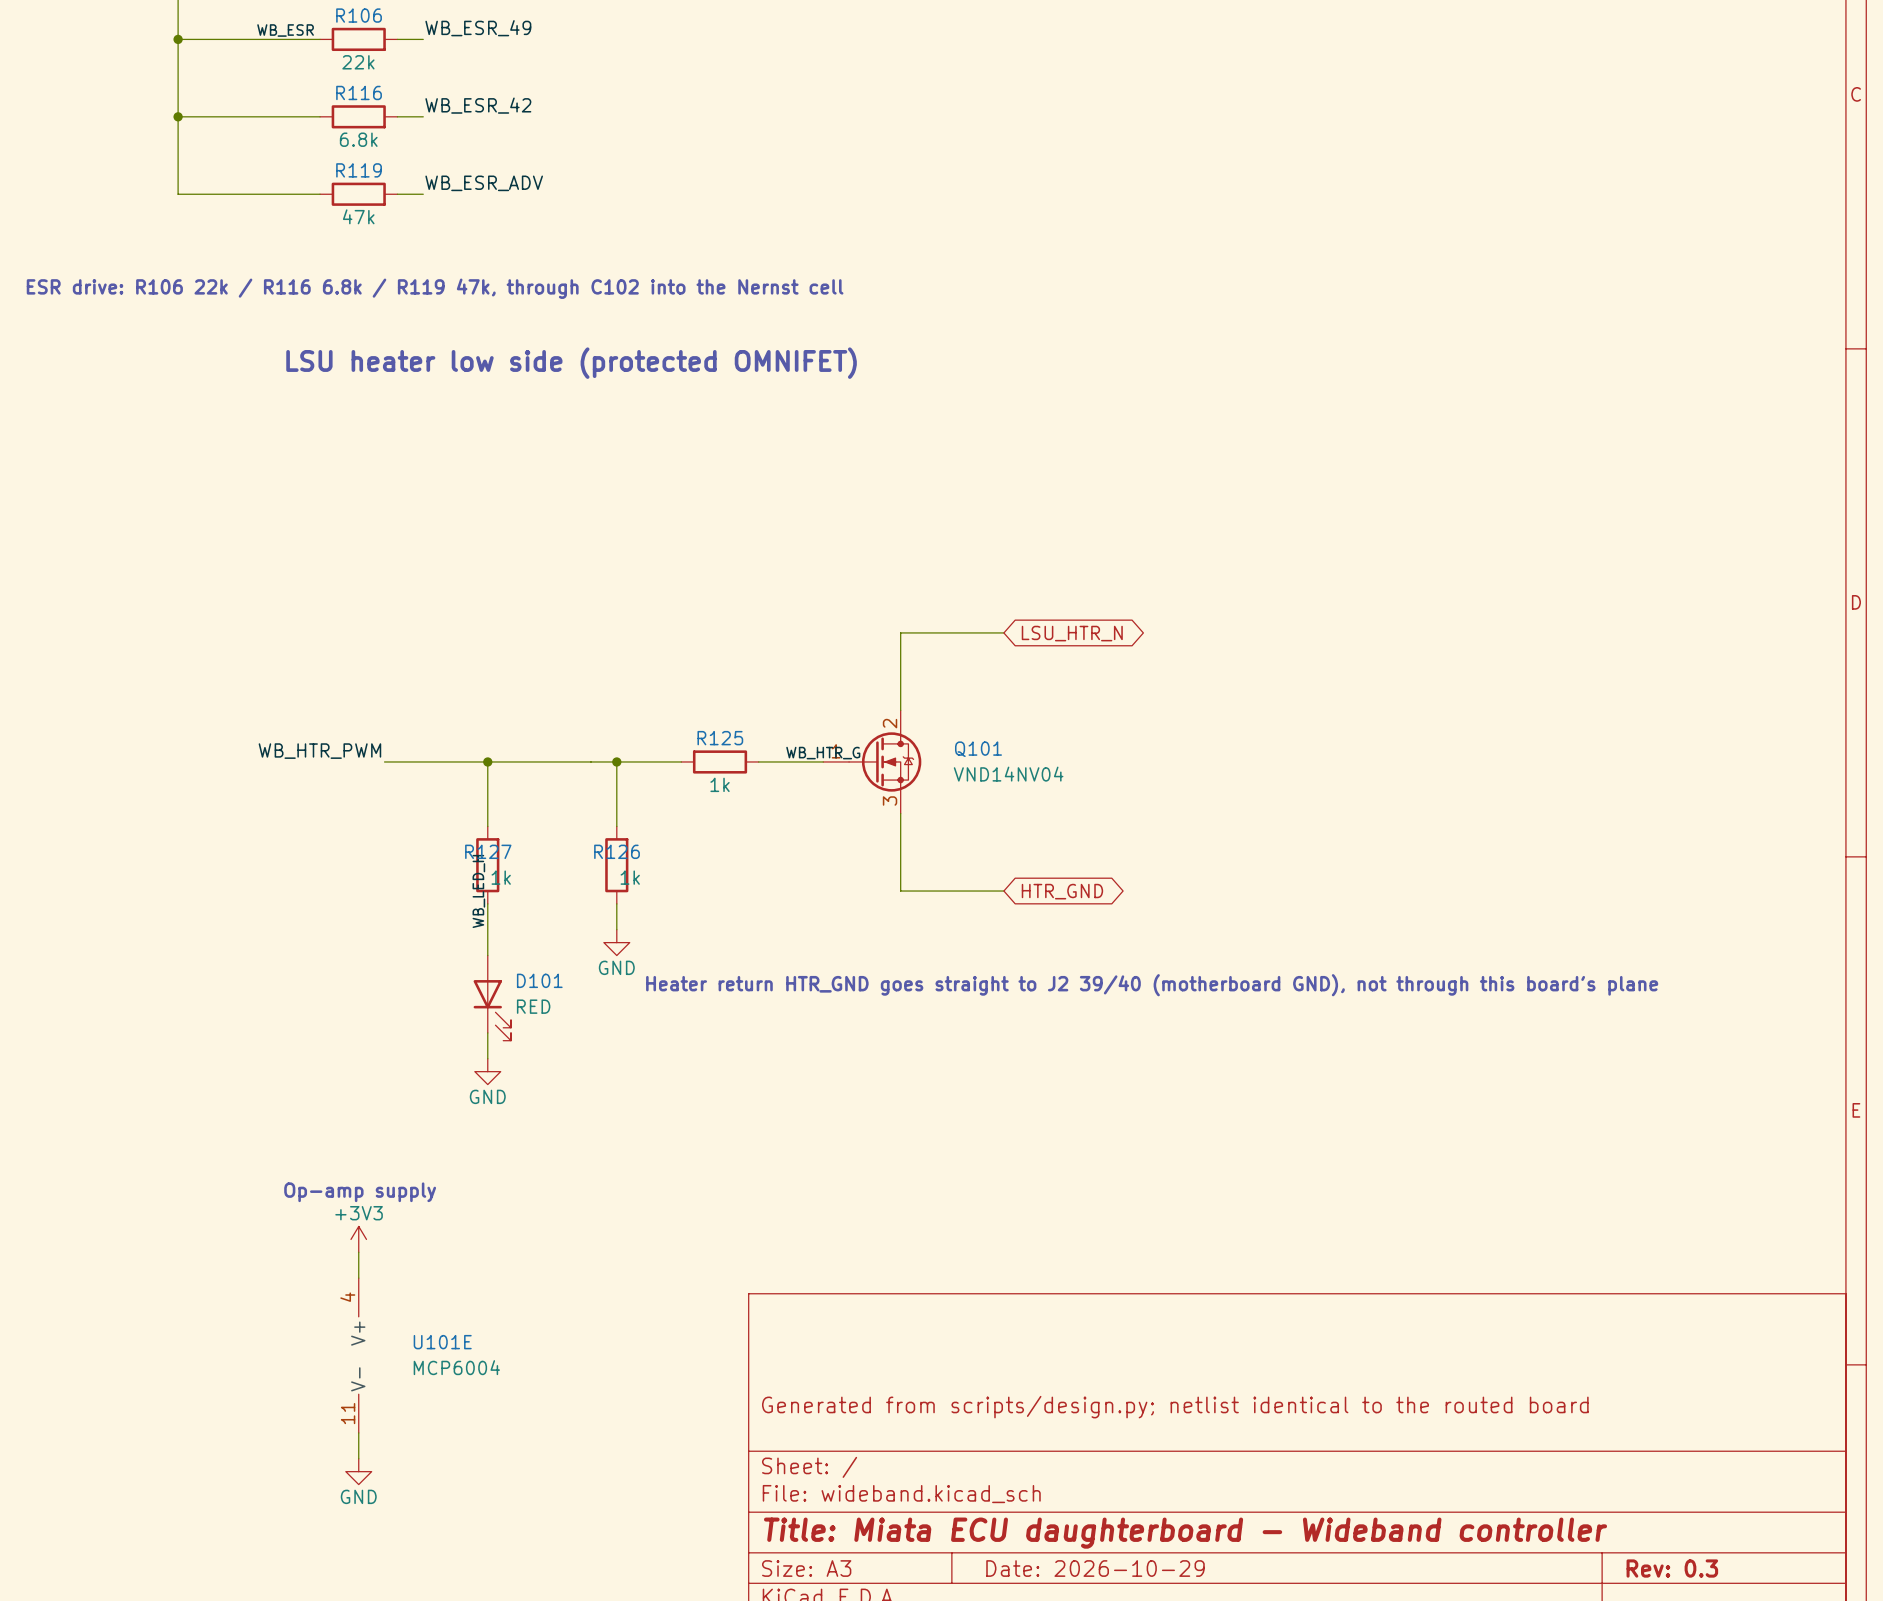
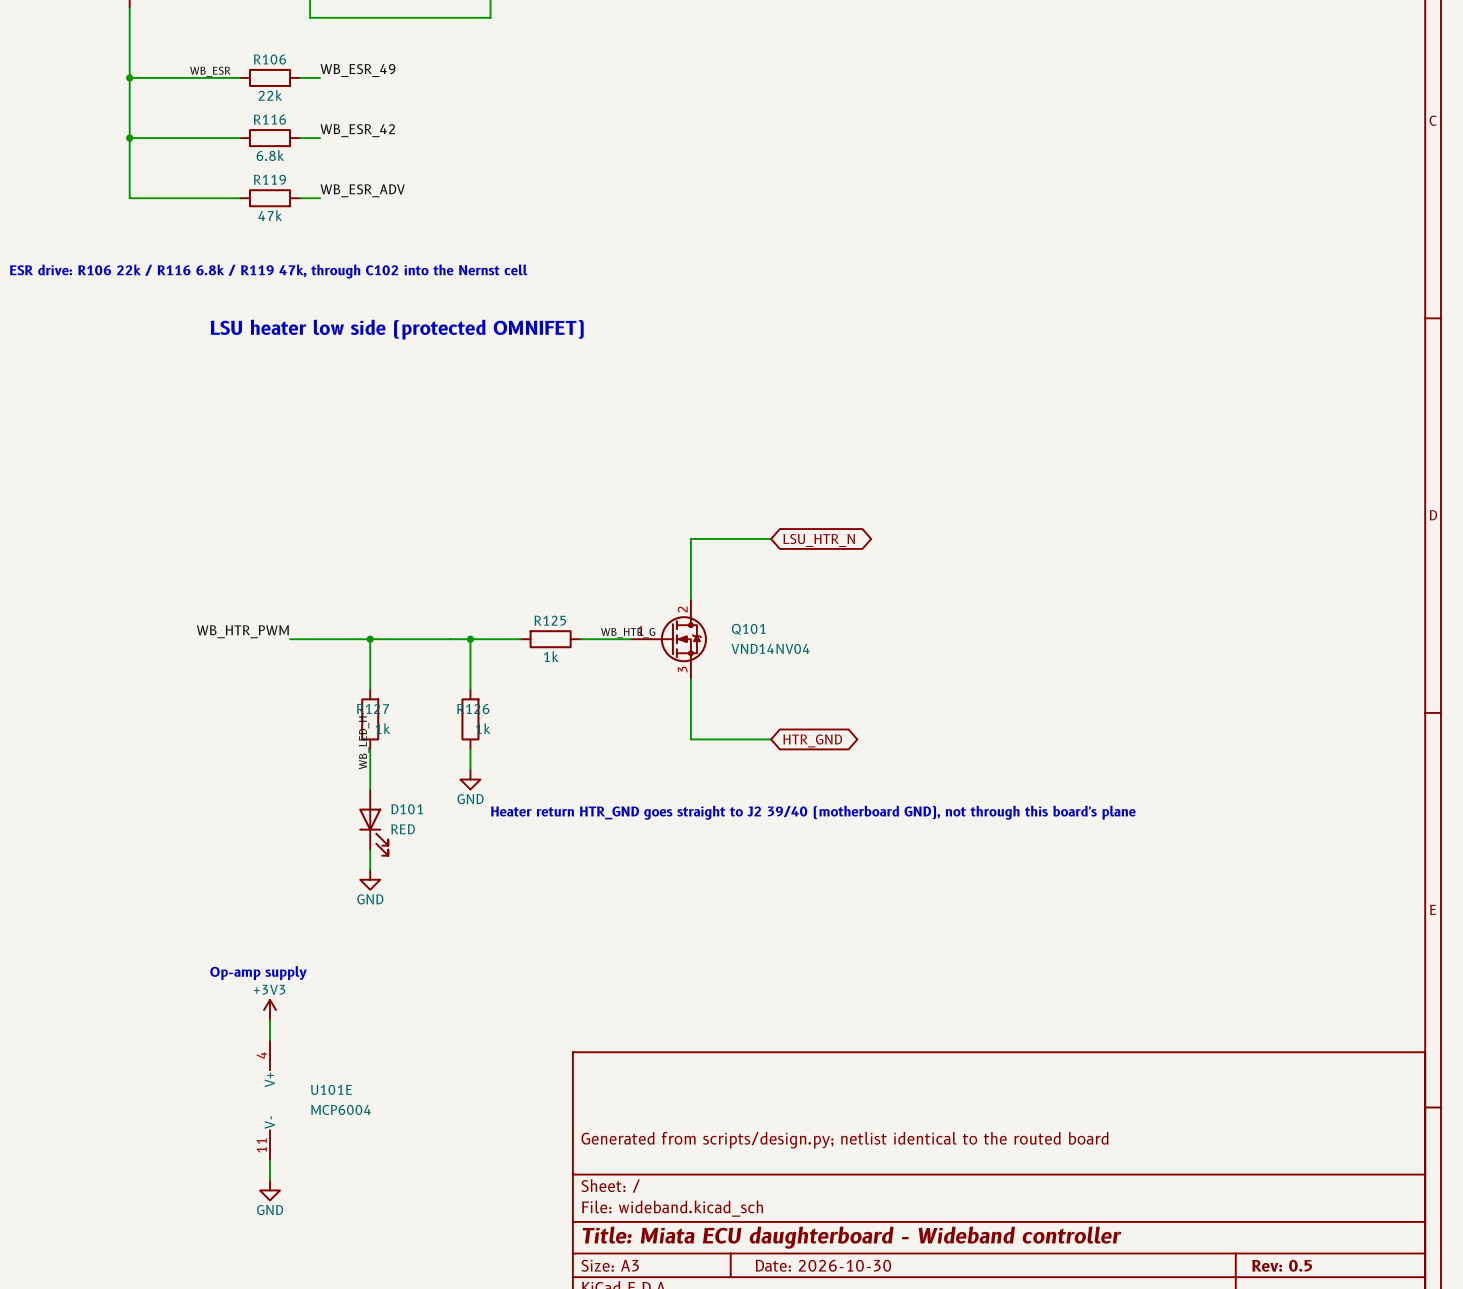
title block: Date: 2026-10-29 (1095, 1568) -> Date: 2026-10-30 (823, 1265)
title block: Rev: 0.3 (1672, 1568) -> Rev: 0.5 (1282, 1265)

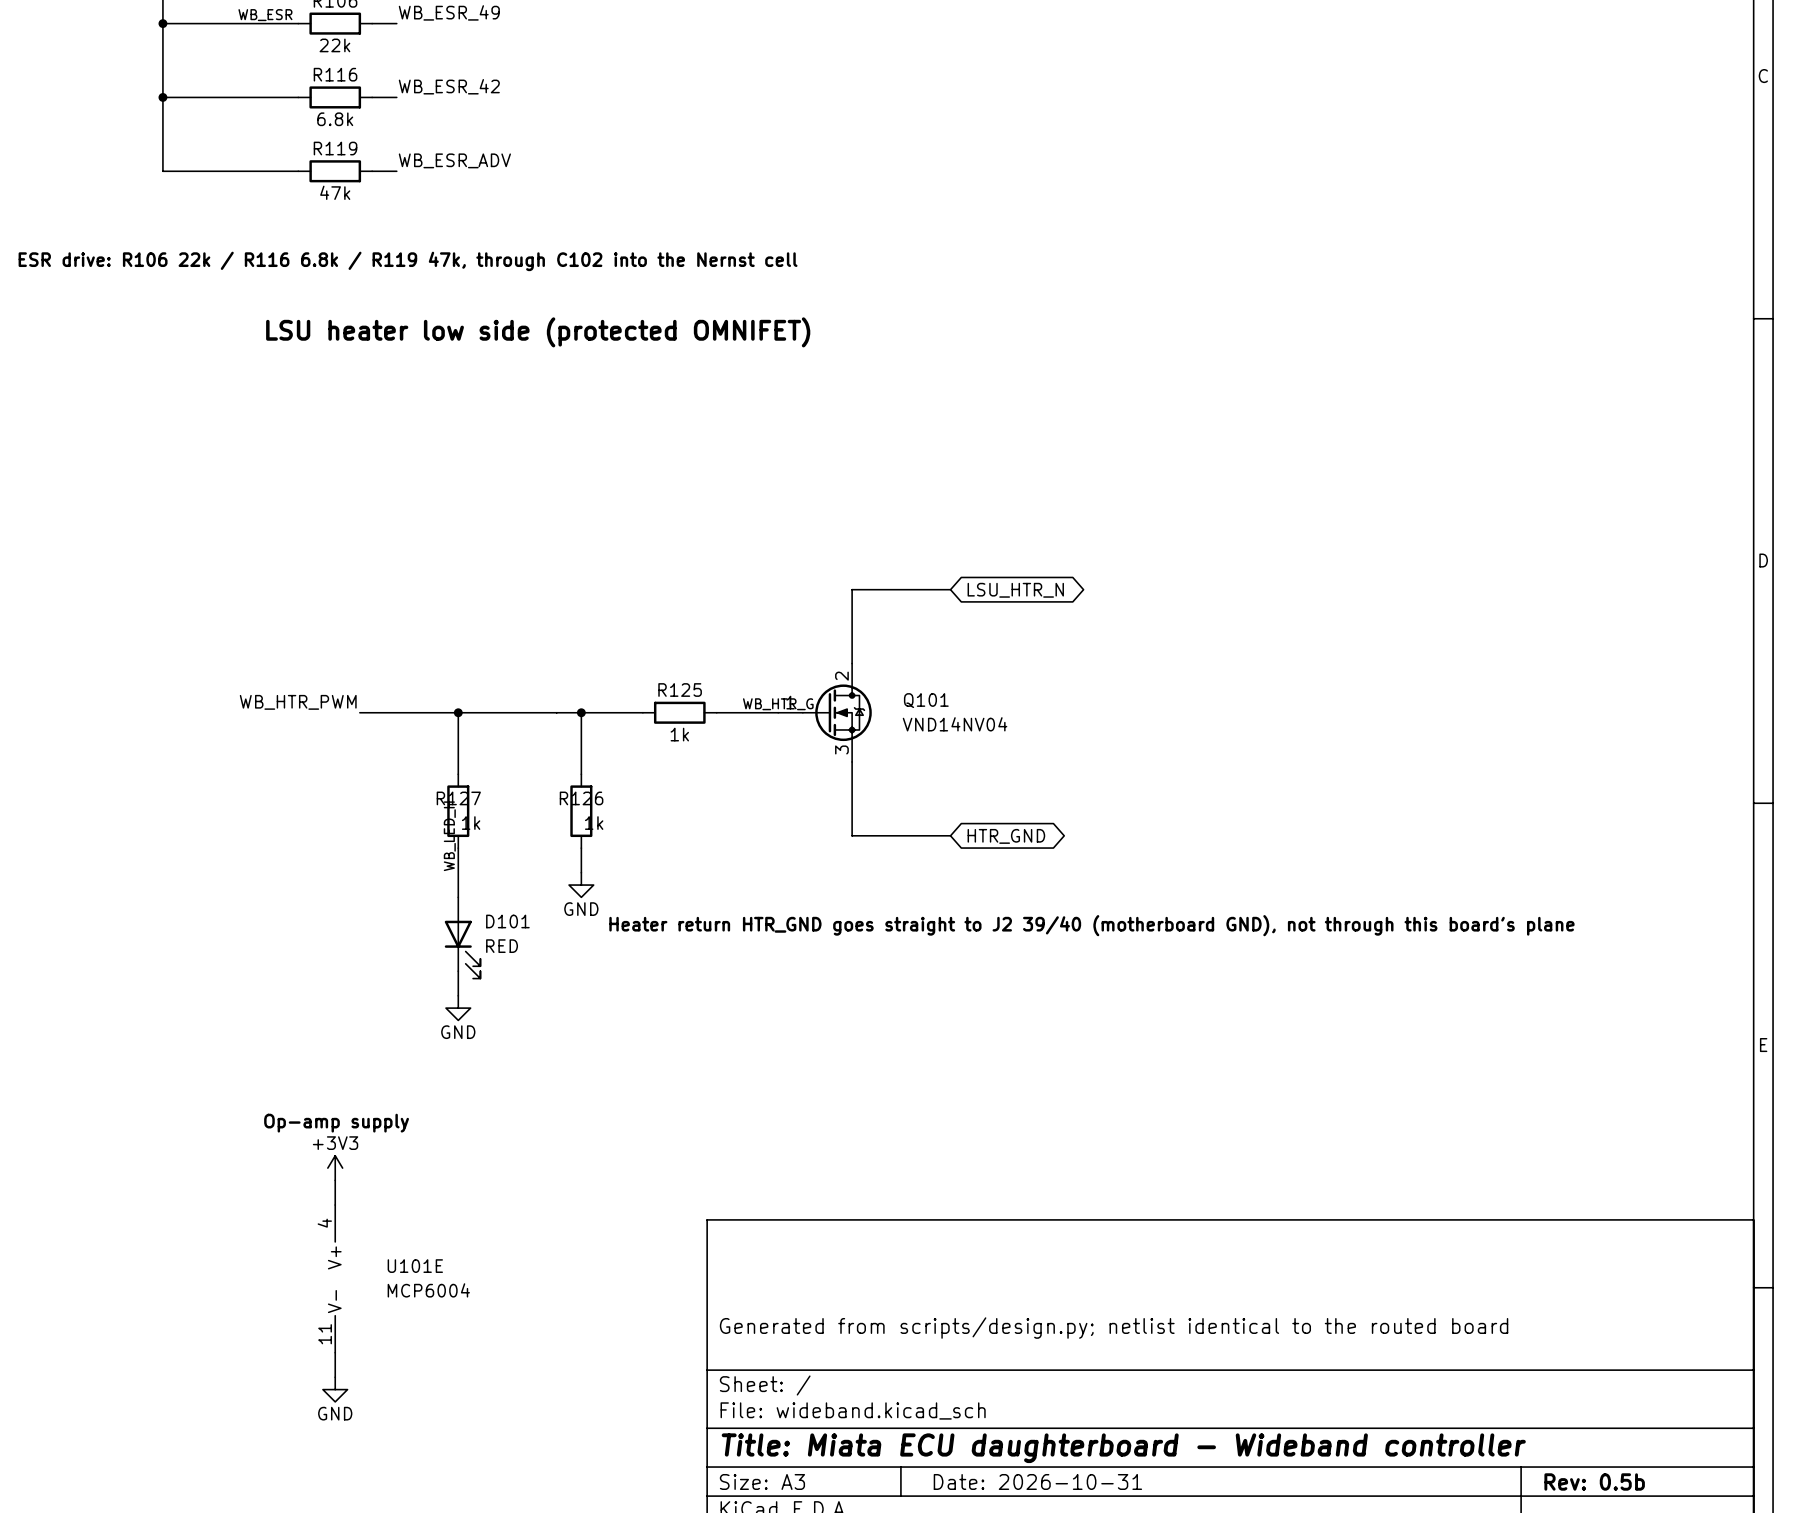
title block: Date: 2026-10-30 (823, 1265) -> Date: 2026-10-31 (1037, 1481)
title block: Rev: 0.5 (1282, 1265) -> Rev: 0.5b (1594, 1481)

